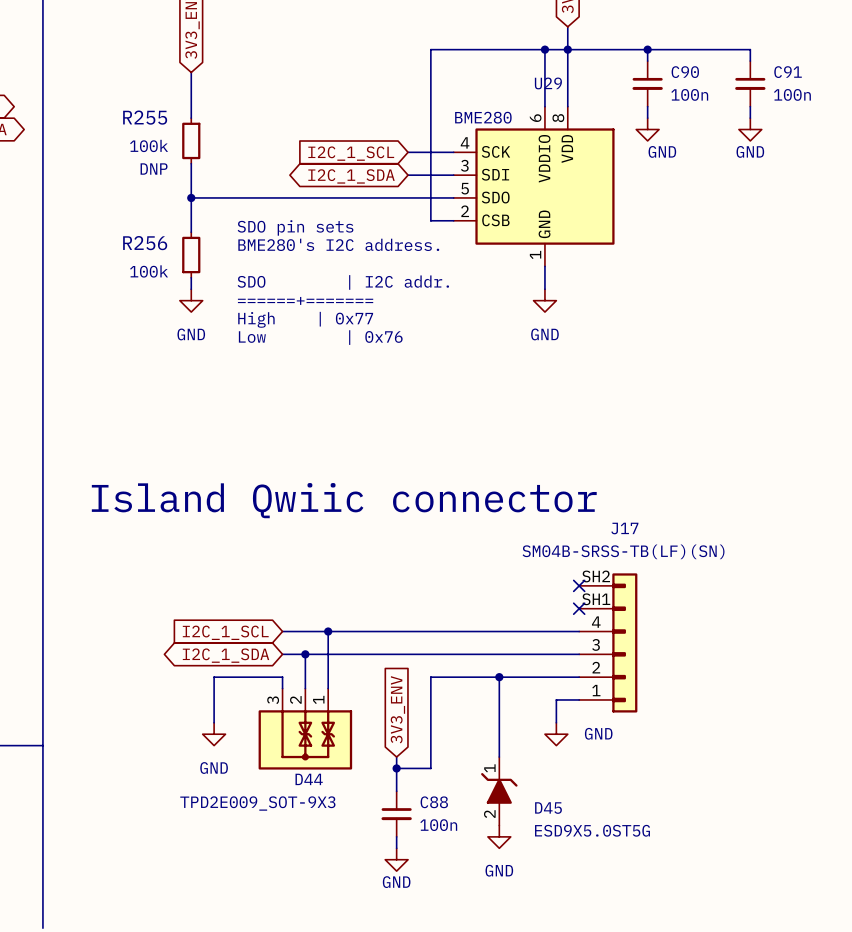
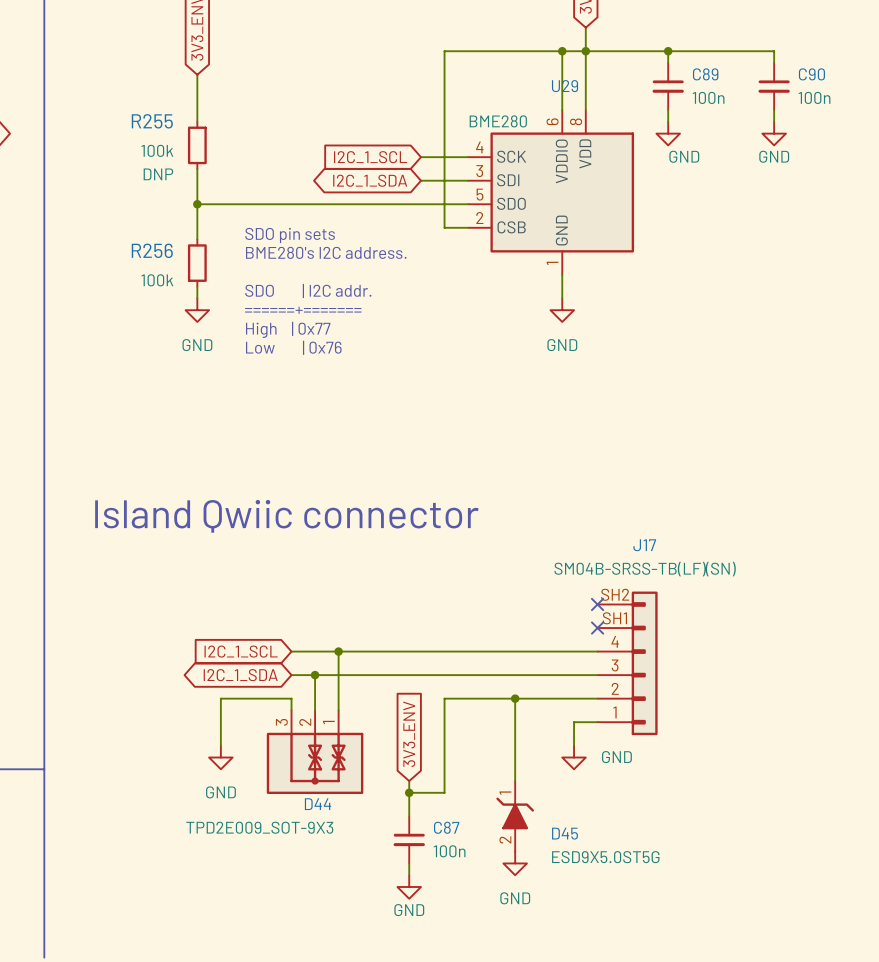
C90 name: C90 (685, 72) -> C89 (705, 74)
C91 name: C91 (788, 72) -> C90 (811, 74)
C88 name: C88 (434, 802) -> C87 (446, 827)

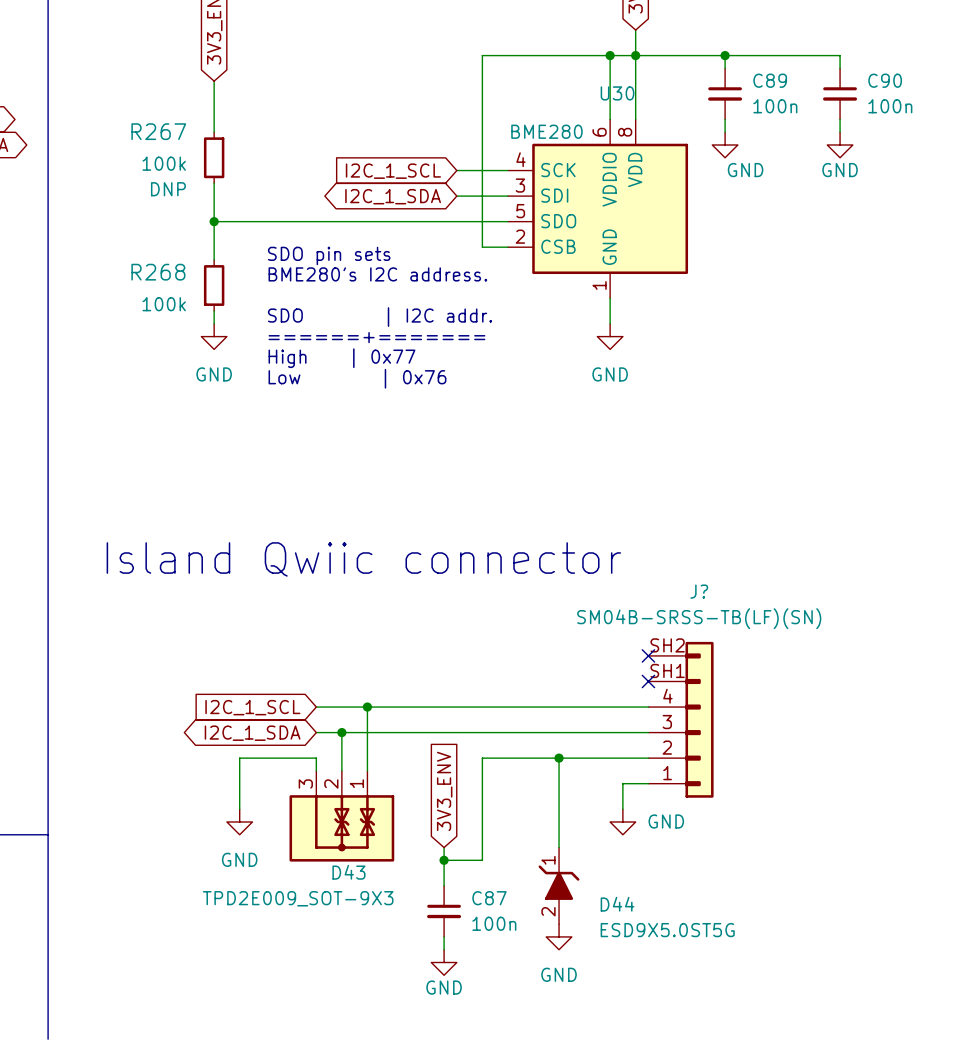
U29 name: U29 (565, 86) -> U30 (617, 93)
R255 name: R255 (152, 121) -> R267 (158, 131)
R256 name: R256 (152, 250) -> R268 (158, 272)
J17 name: J17 (644, 545) -> J? (699, 591)
D44 name: D44 (318, 804) -> D43 (348, 872)
D45 name: D45 (565, 833) -> D44 (617, 904)

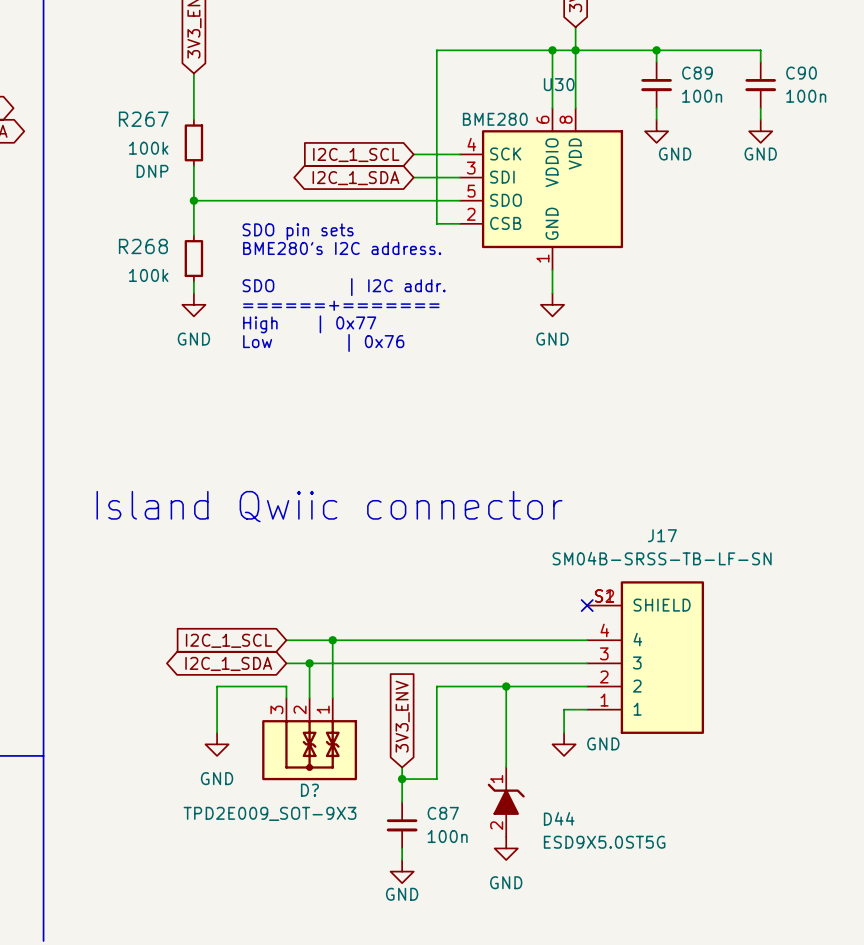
no-connect mark: (648, 655) -> none
no-connect mark: none -> (587, 605)
no-connect mark: (648, 681) -> none
J?: (681, 719) -> none
J17: none -> SM04B-SRSS-TB-LF-SN (645, 657)
D43 name: D43 (348, 872) -> D? (309, 790)

